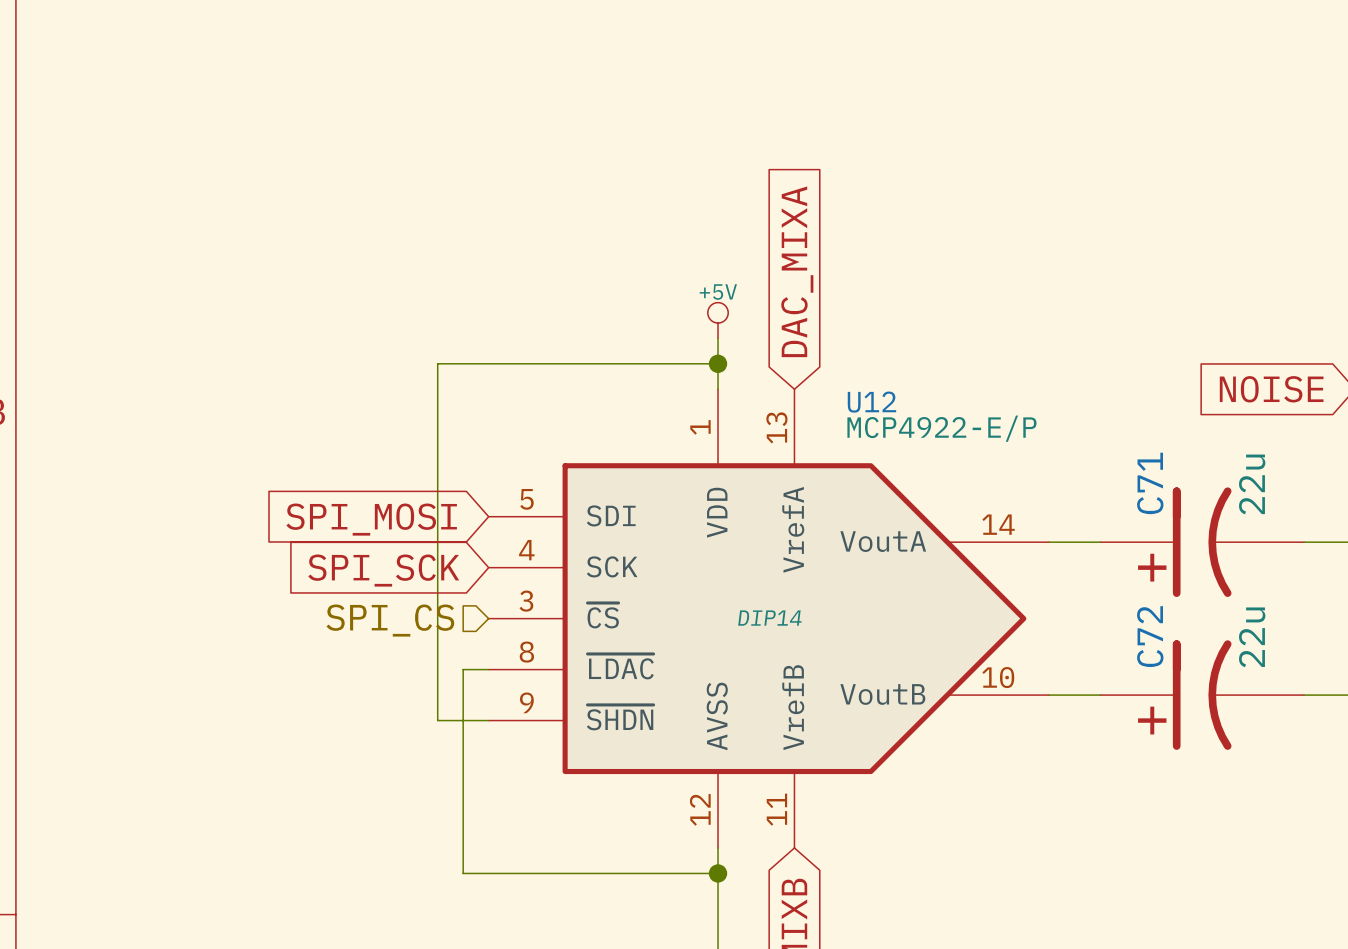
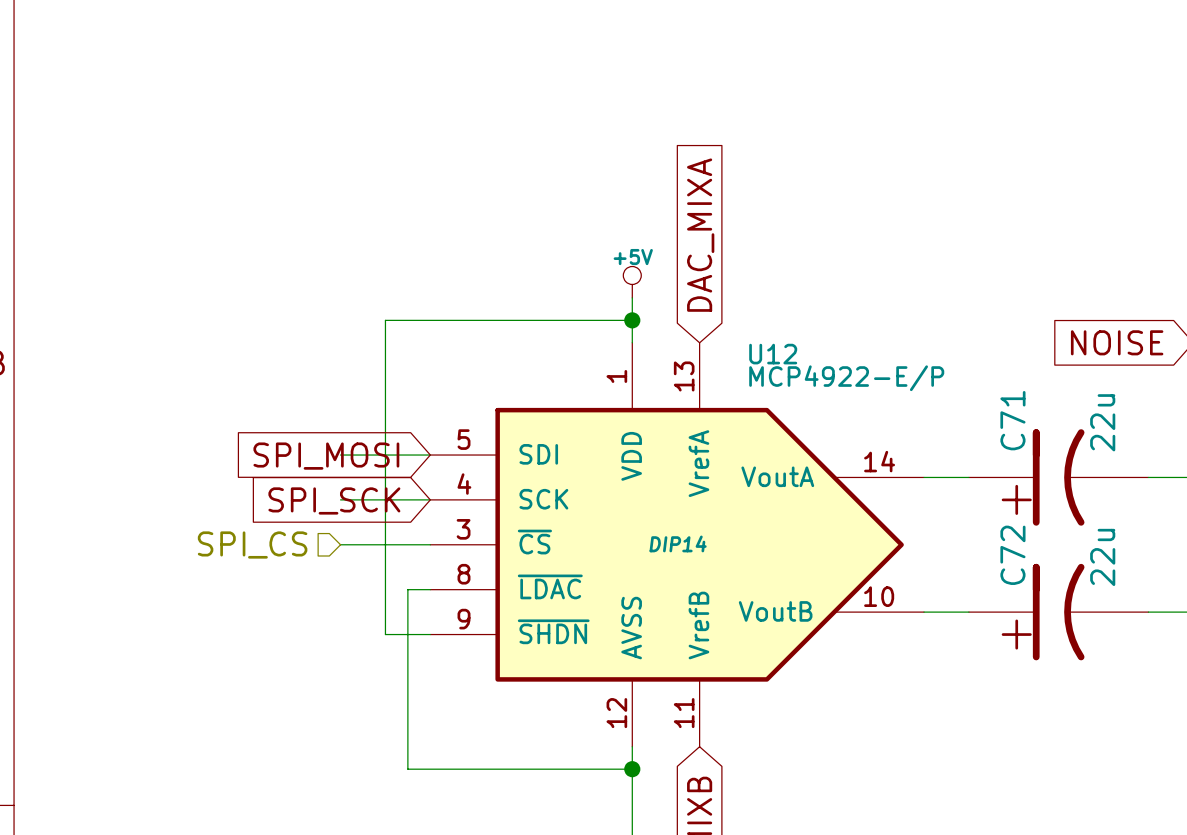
wire: none -> (340, 455) (430, 455)
wire: none -> (340, 499) (430, 499)
wire: none -> (340, 544) (430, 544)
hierarchical label position: SPI_CS (390, 620) -> SPI_CS (252, 545)

